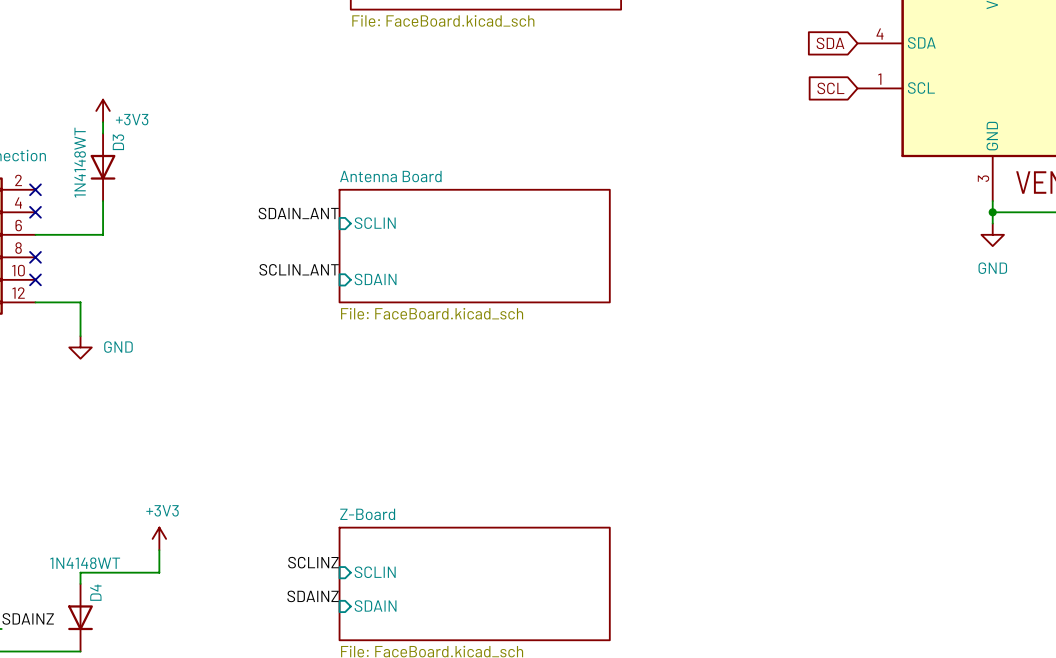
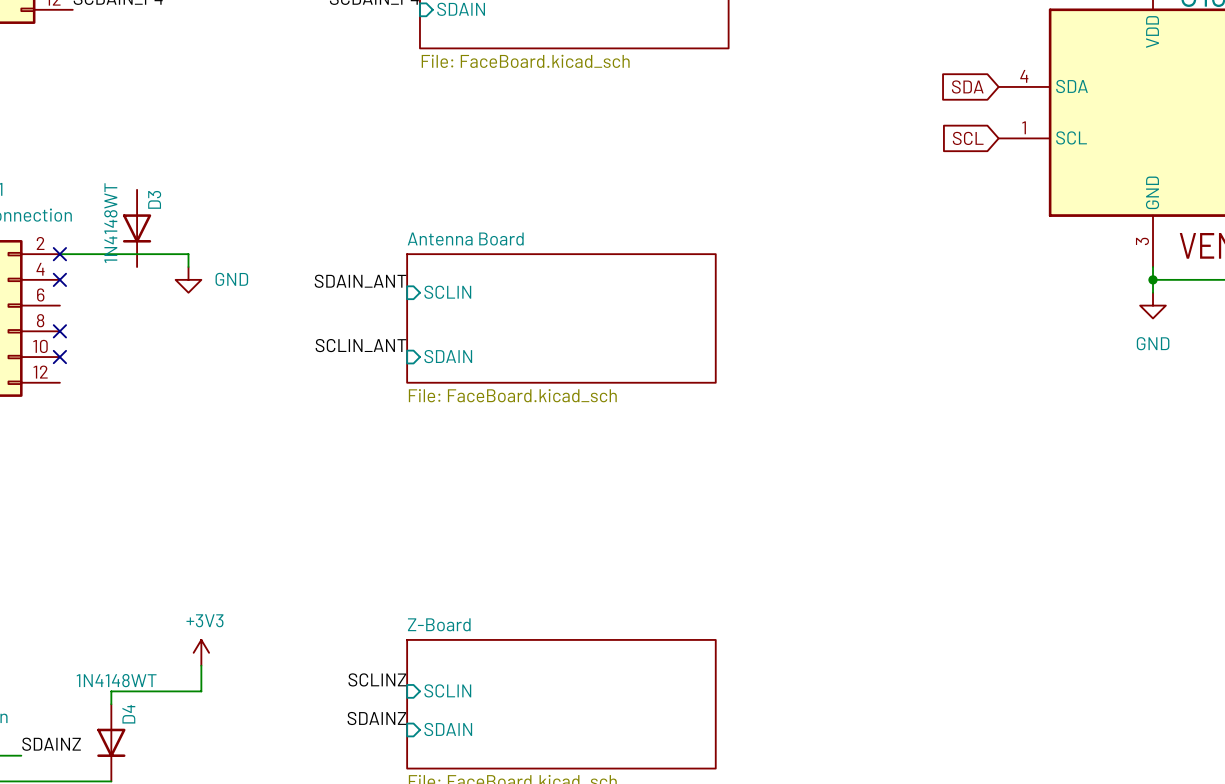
power symbol: +3V3 (103, 110) -> none
wire: (103, 122) (103, 133) -> none
wire: none -> (59, 254) (188, 254) (188, 267)
wire: (103, 201) (103, 234) (35, 234) -> none
wire: (35, 302) (80, 302) (80, 336) -> none
power symbol position: GND (80, 347) -> GND (188, 279)

